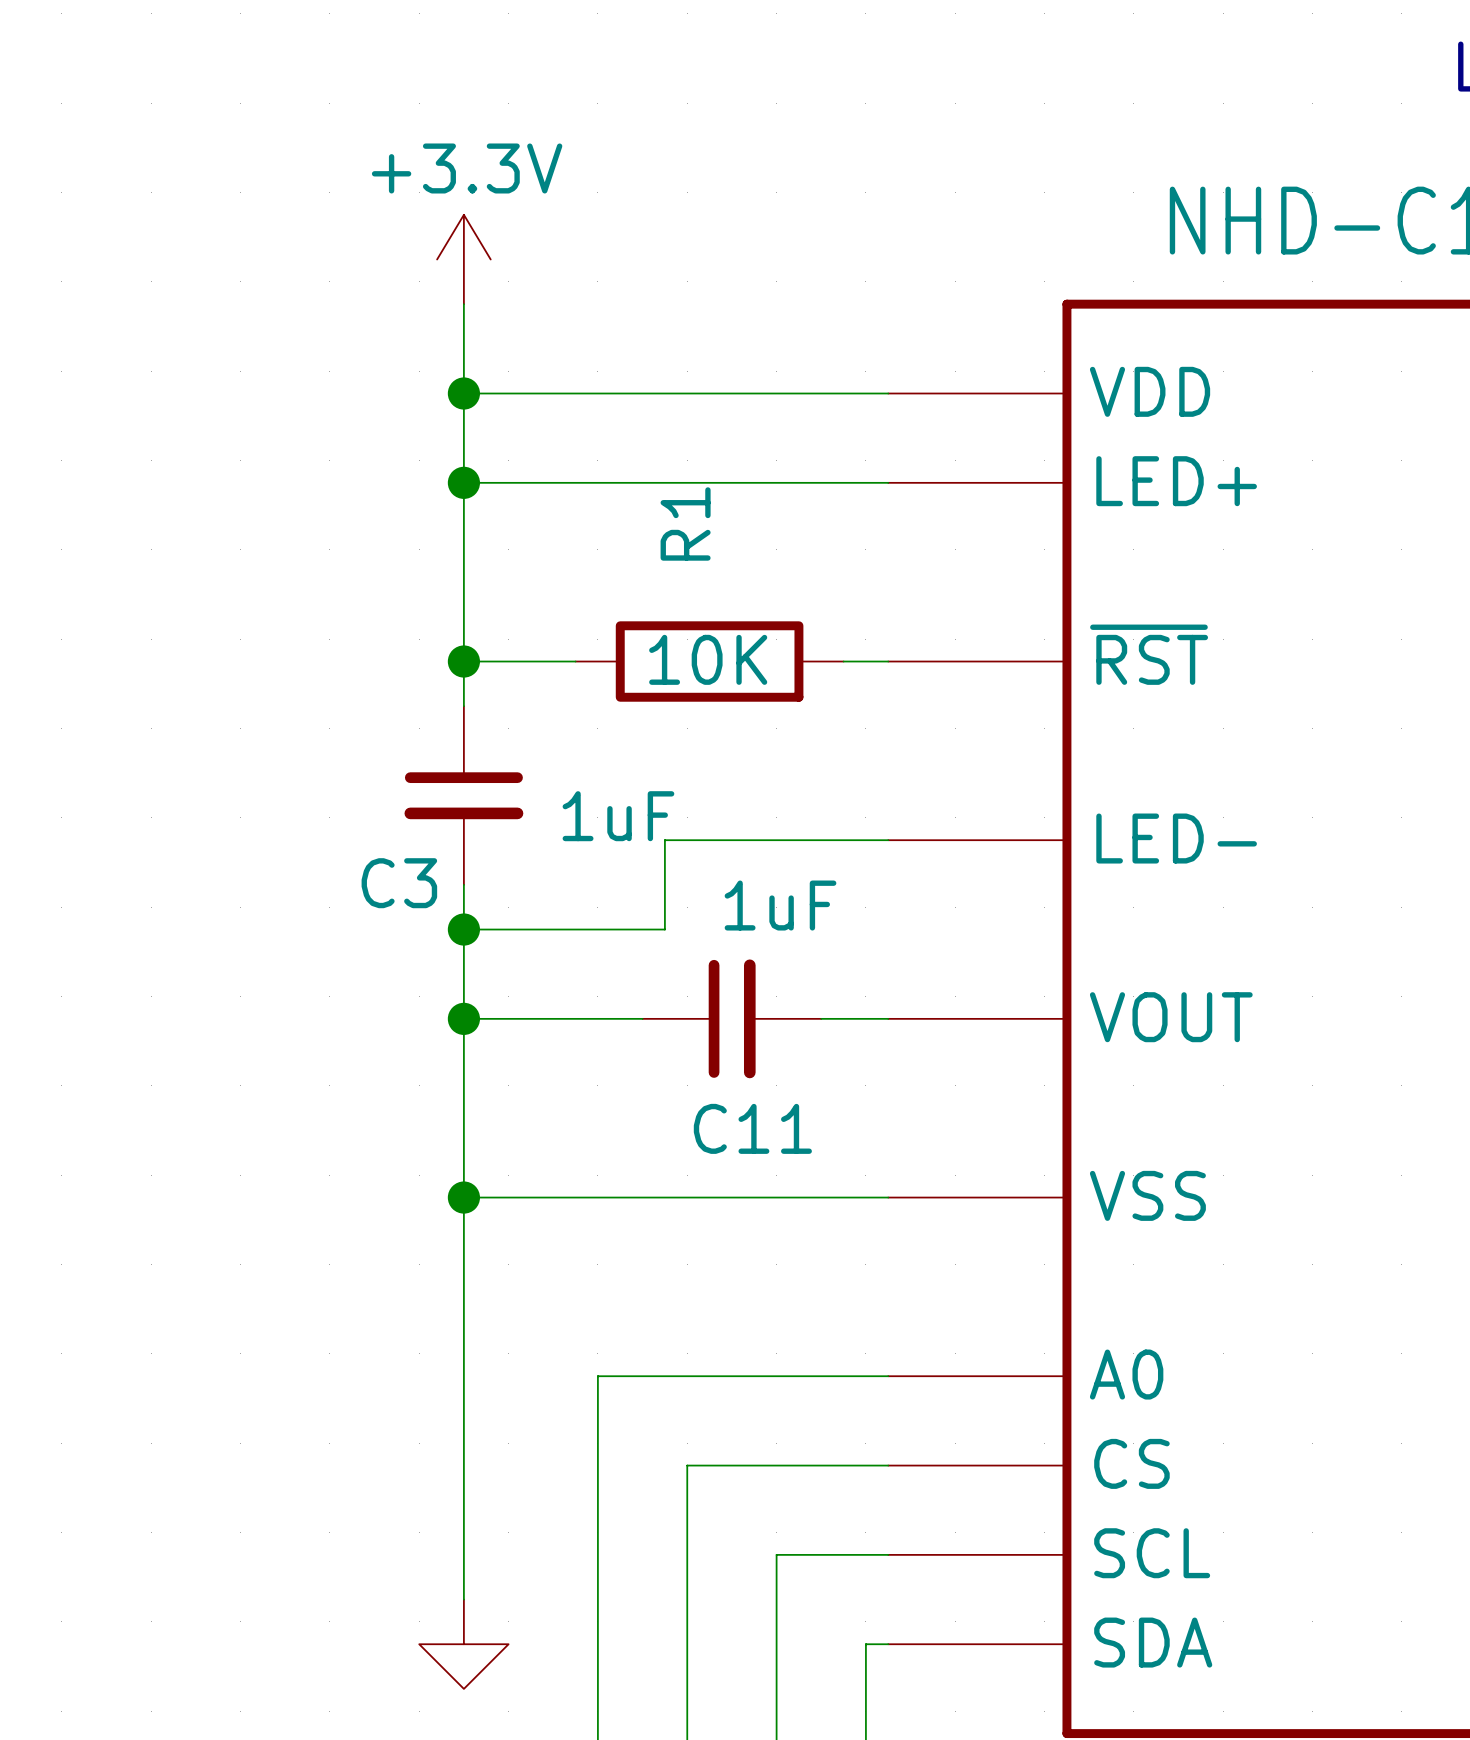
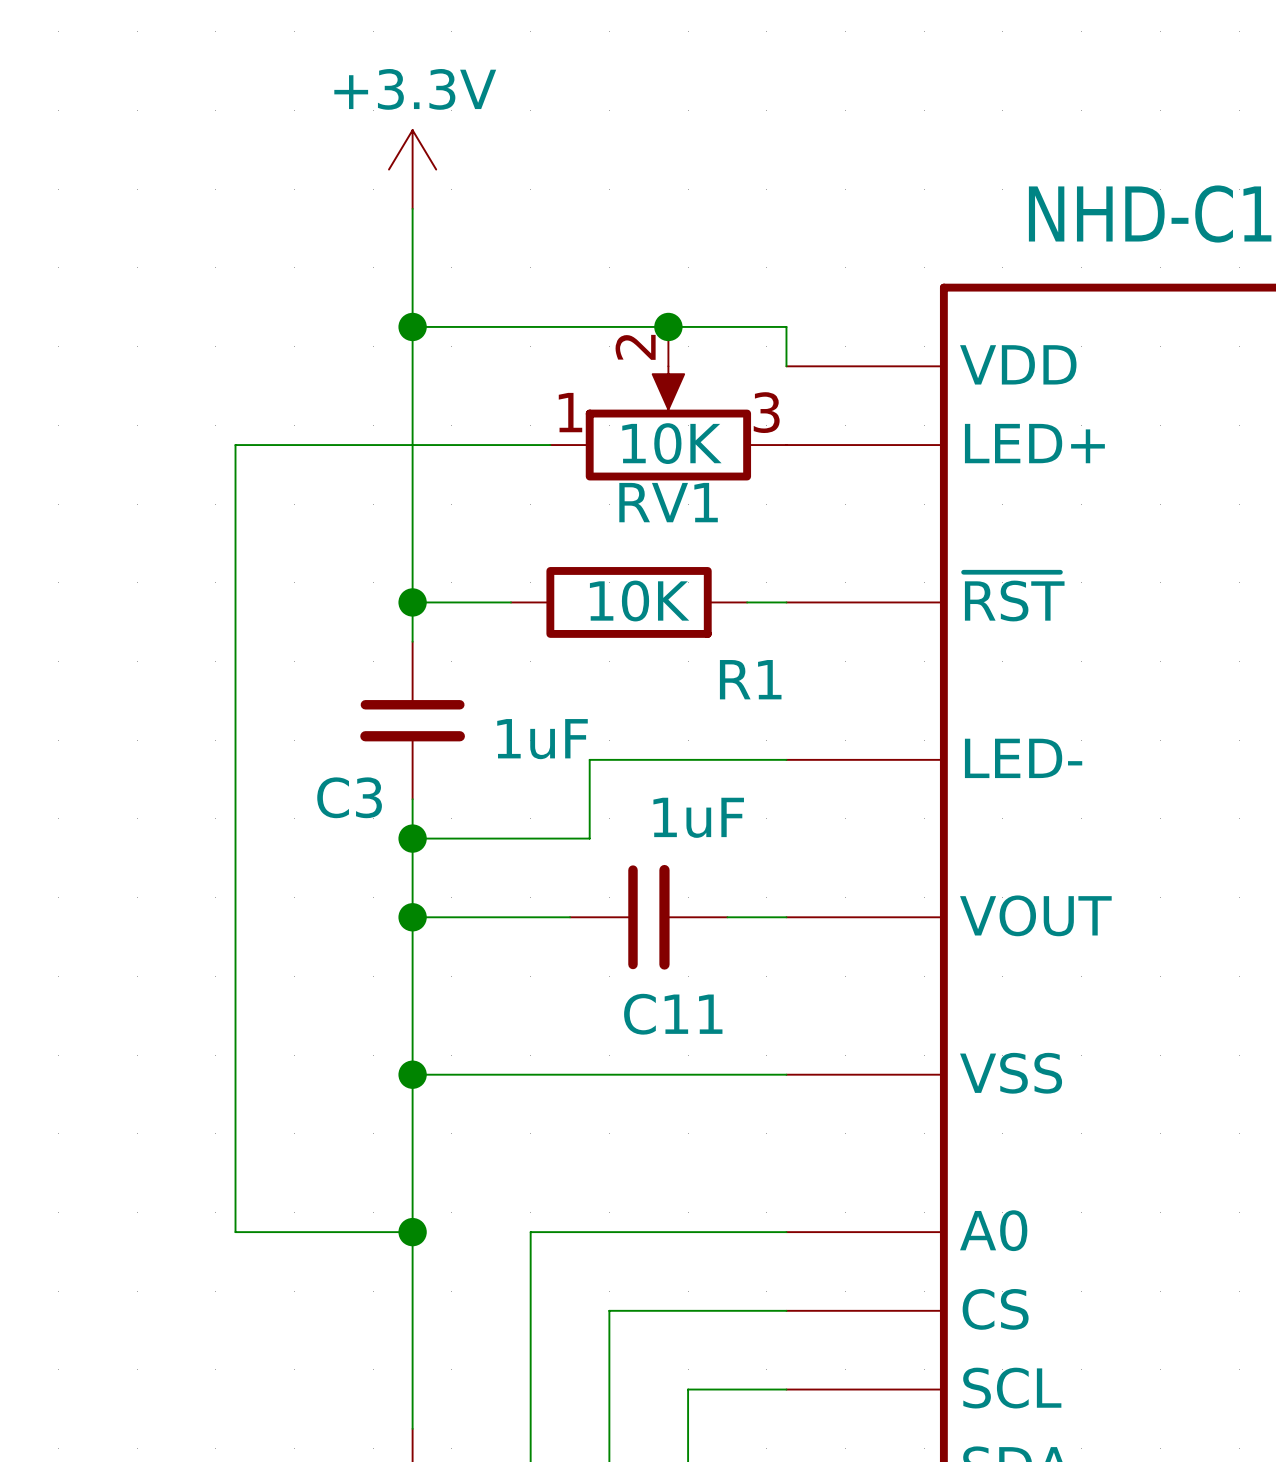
power symbol position: +3.3V (463, 259) -> +3.3V (412, 169)
junction: none -> (668, 326)
wire: (463, 393) (888, 393) -> (412, 326) (786, 326) (786, 366)
junction position: (463, 393) -> (412, 326)
RV1: none -> 10K (668, 403)
wire: none -> (412, 445) (235, 445) (235, 1232) (412, 1232)
junction: (463, 482) -> none
wire: (620, 482) (888, 482) -> none
R1 name rotation: 0° (685, 523) -> 90° clockwise (750, 679)
R1 name position: R1 (685, 523) -> R1 (750, 679)
junction: none -> (412, 1232)

